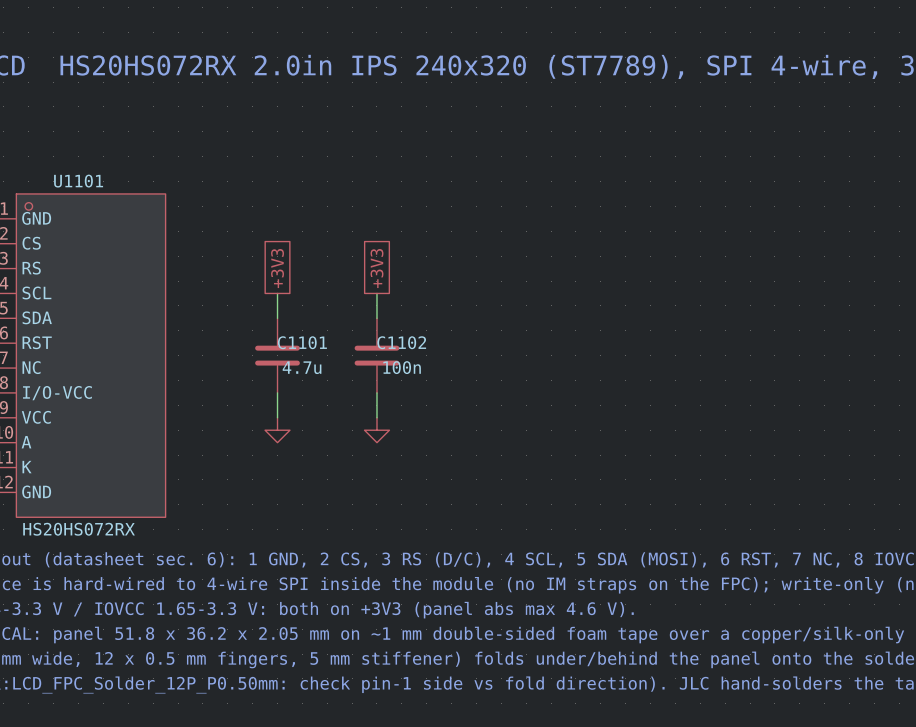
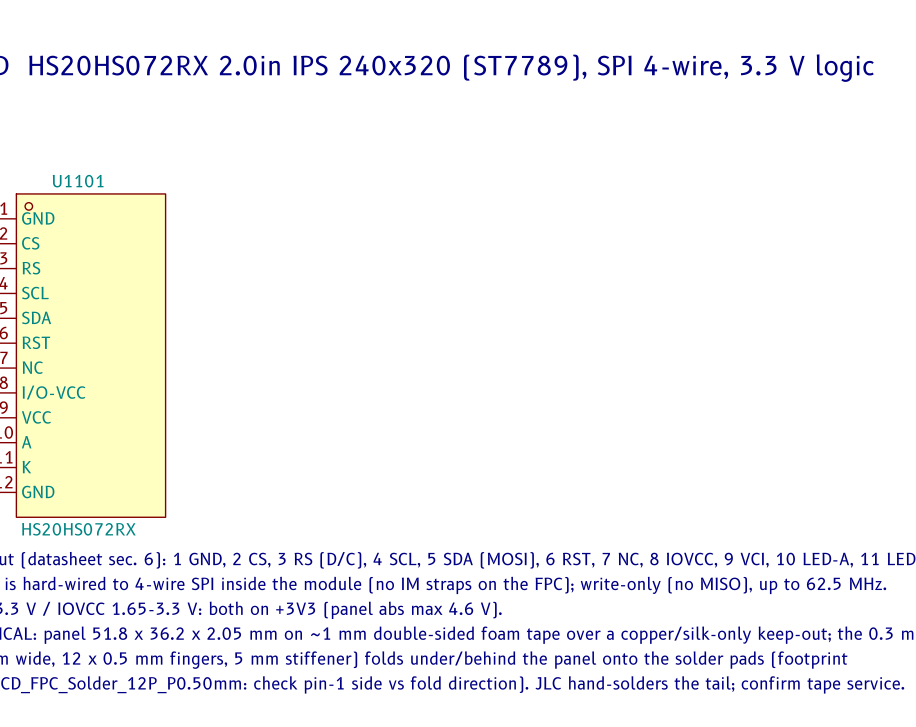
global label: +3V3 (277, 268) -> none
global label: +3V3 (377, 268) -> none
wire: (277, 293) (277, 318) -> none
wire: (376, 293) (376, 318) -> none
C1101: 4.7u (277, 355) -> none
C1102: 100n (376, 355) -> none
wire: (277, 392) (277, 417) -> none
wire: (376, 392) (376, 417) -> none
power symbol: (277, 430) -> none
power symbol: (376, 430) -> none

